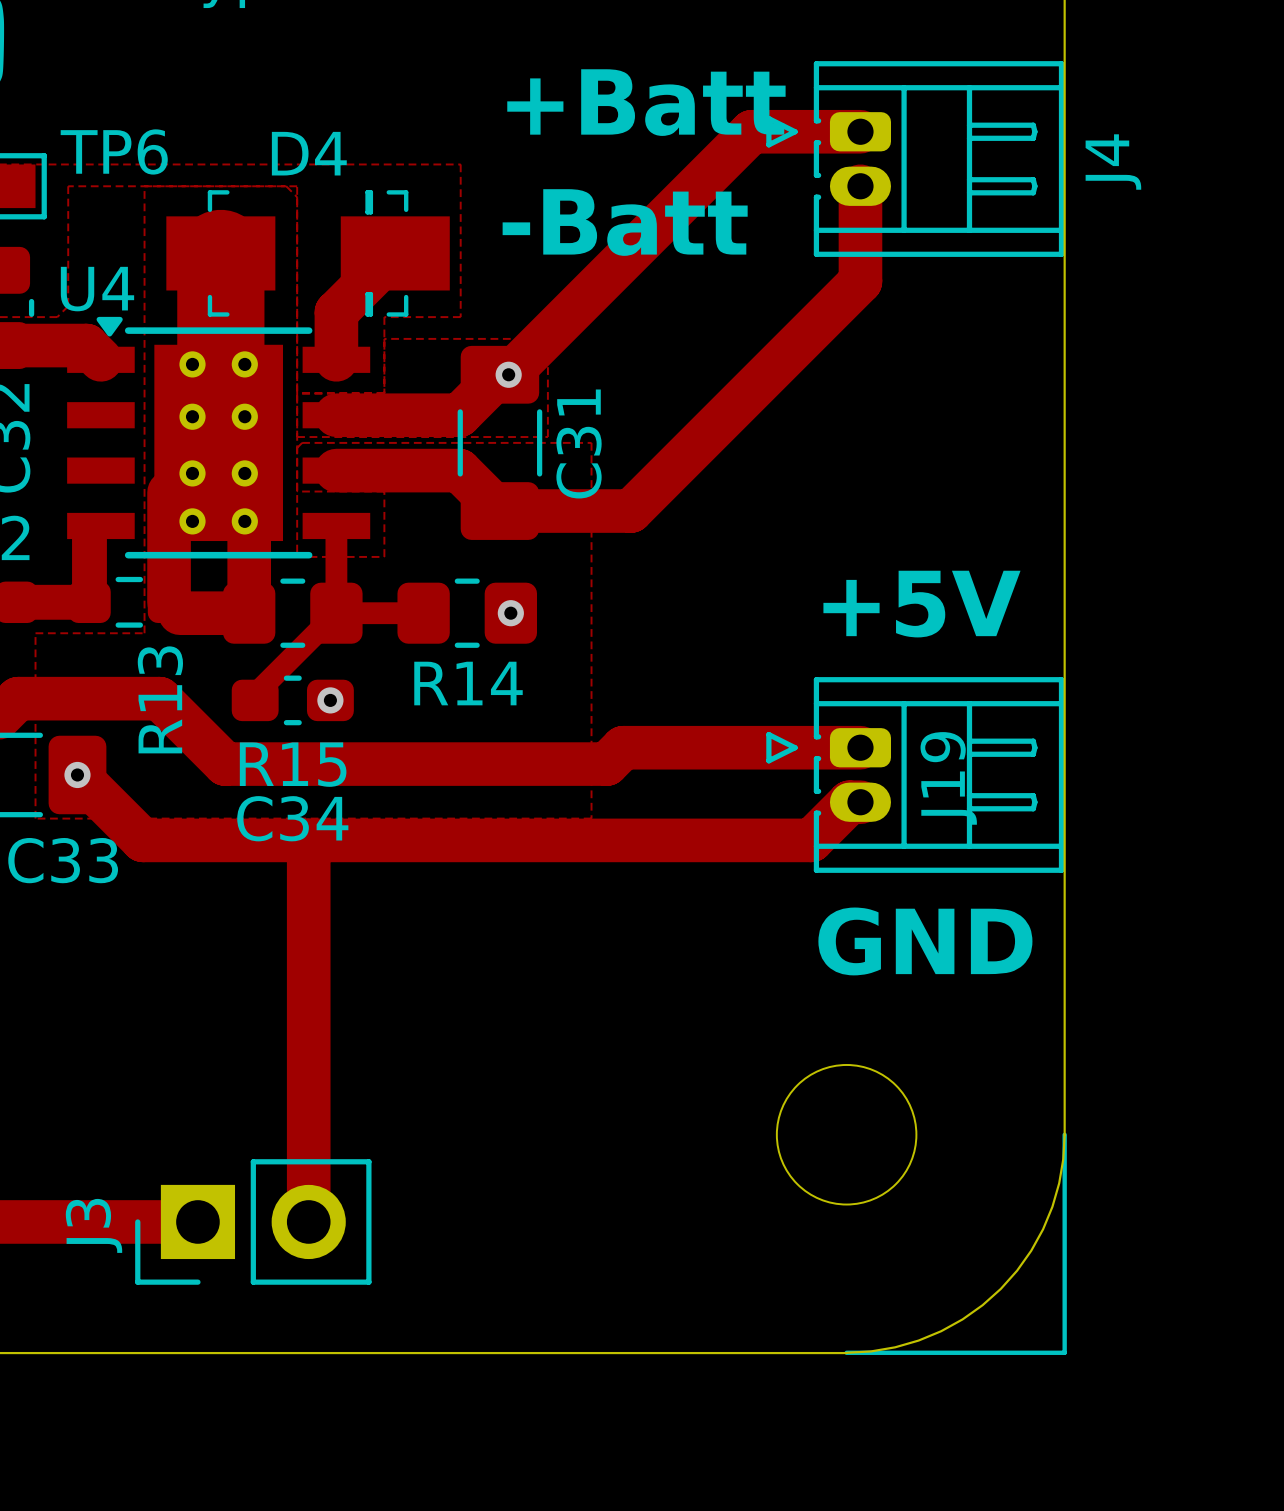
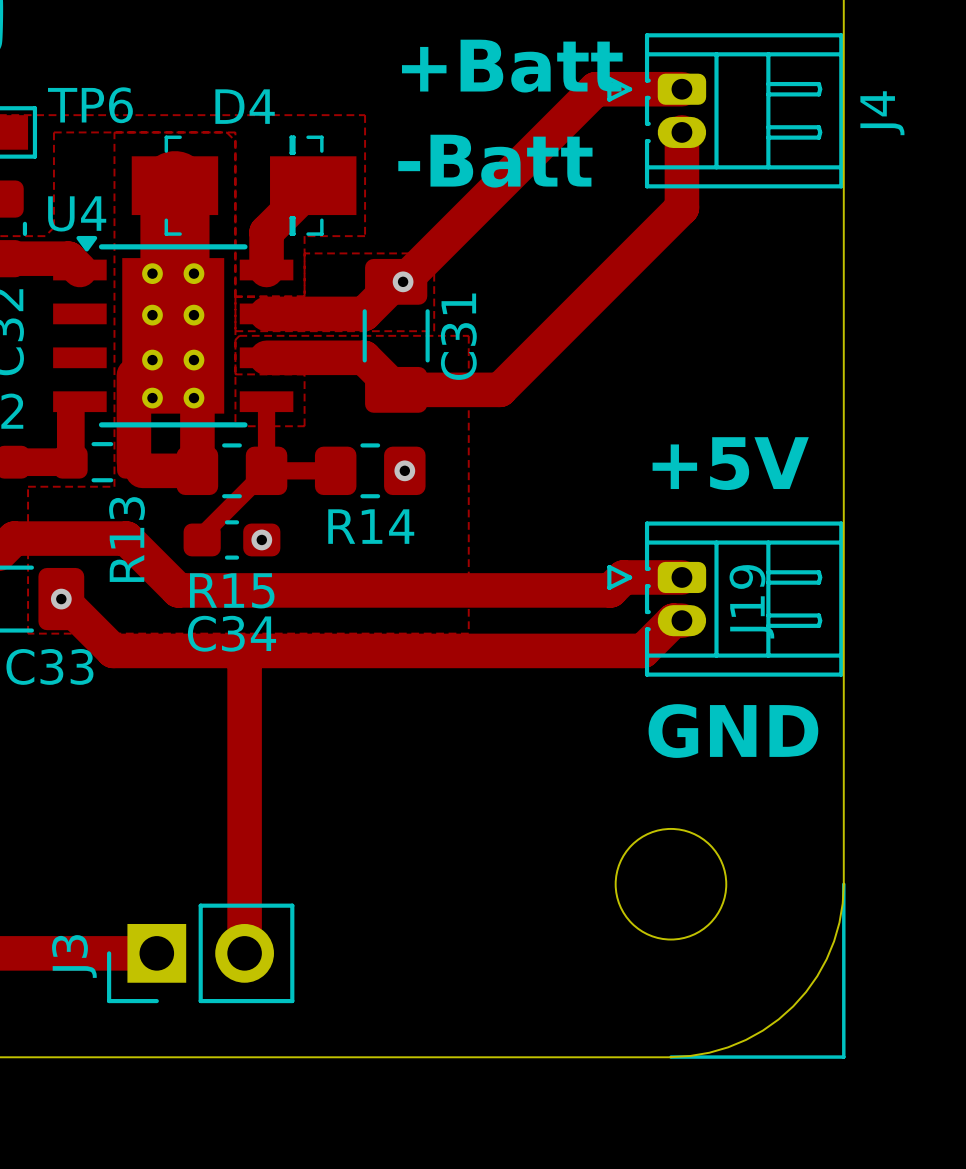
track: (786, 747) (623, 747) (606, 764) -> (623, 577) (610, 590) (480, 590)

